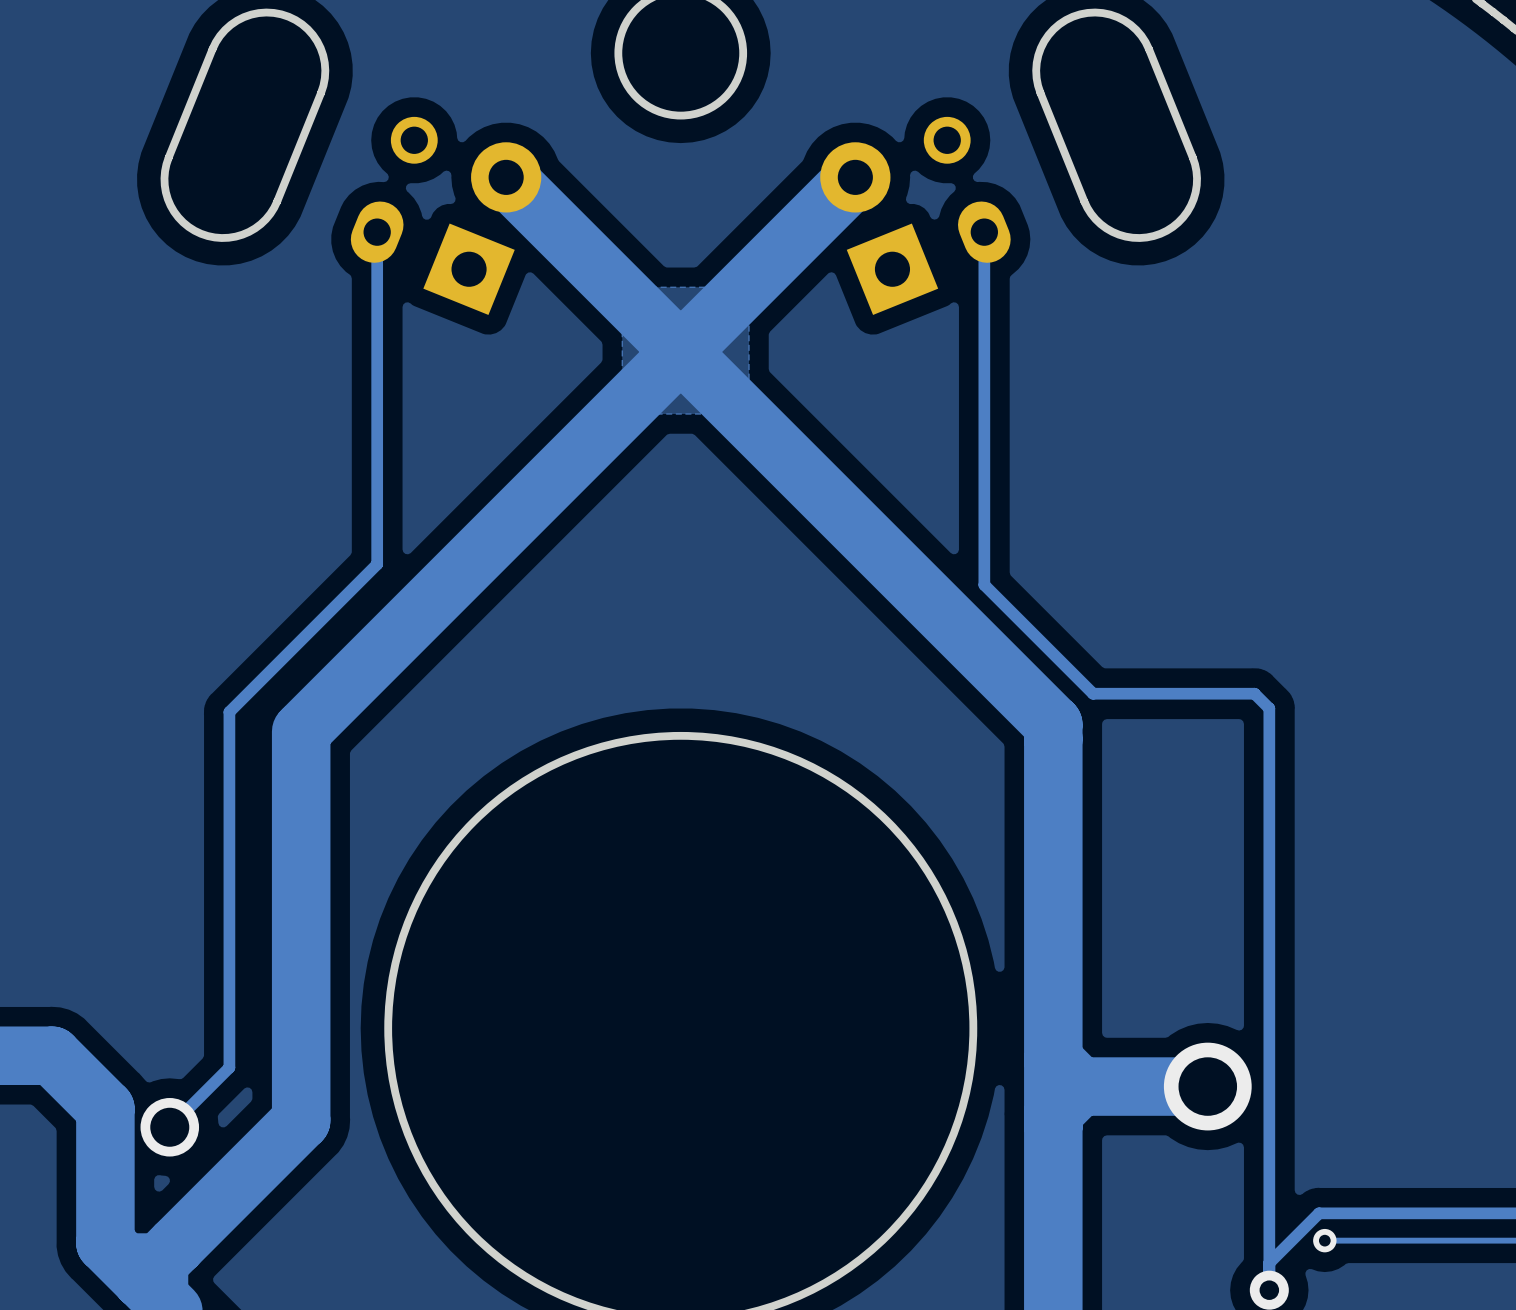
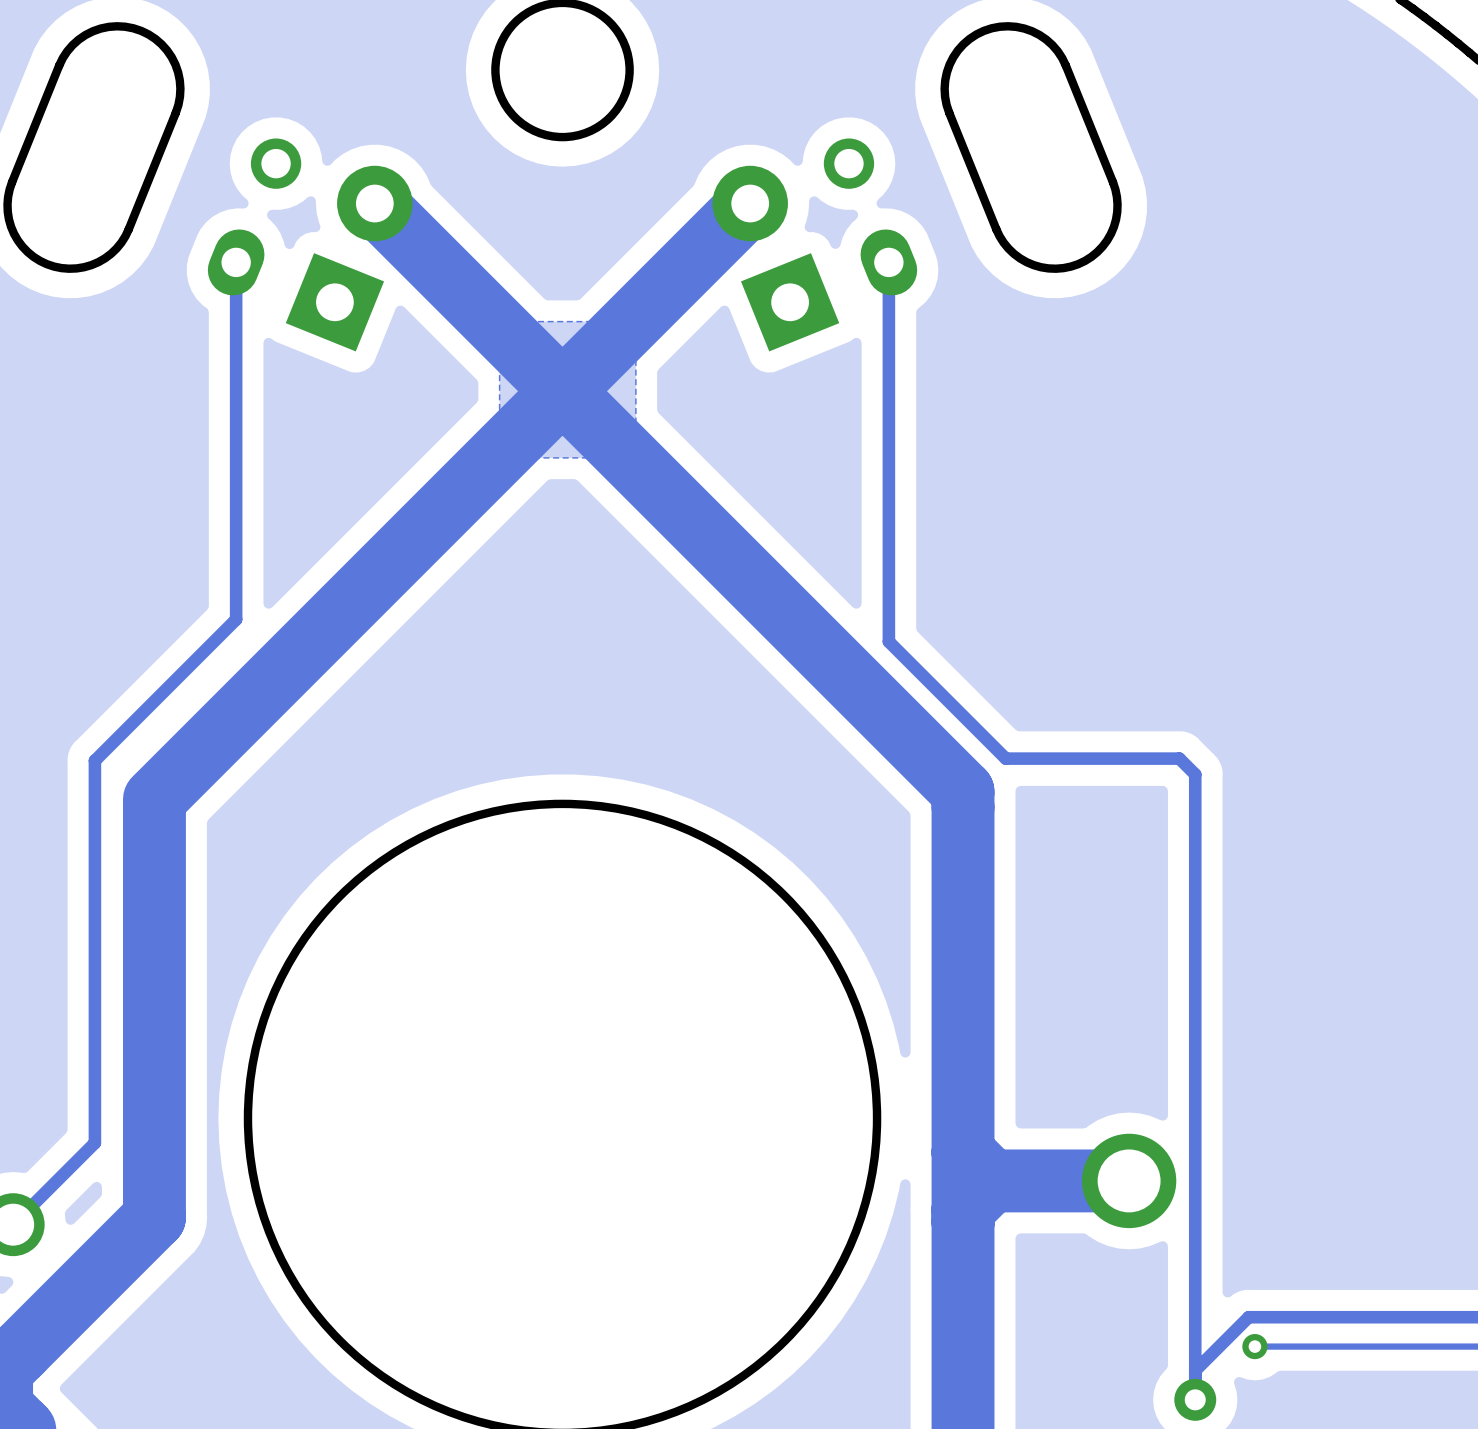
track: (245, 695) (229, 712) (229, 1067) -> (94, 760) (94, 1142) (77, 1160)

